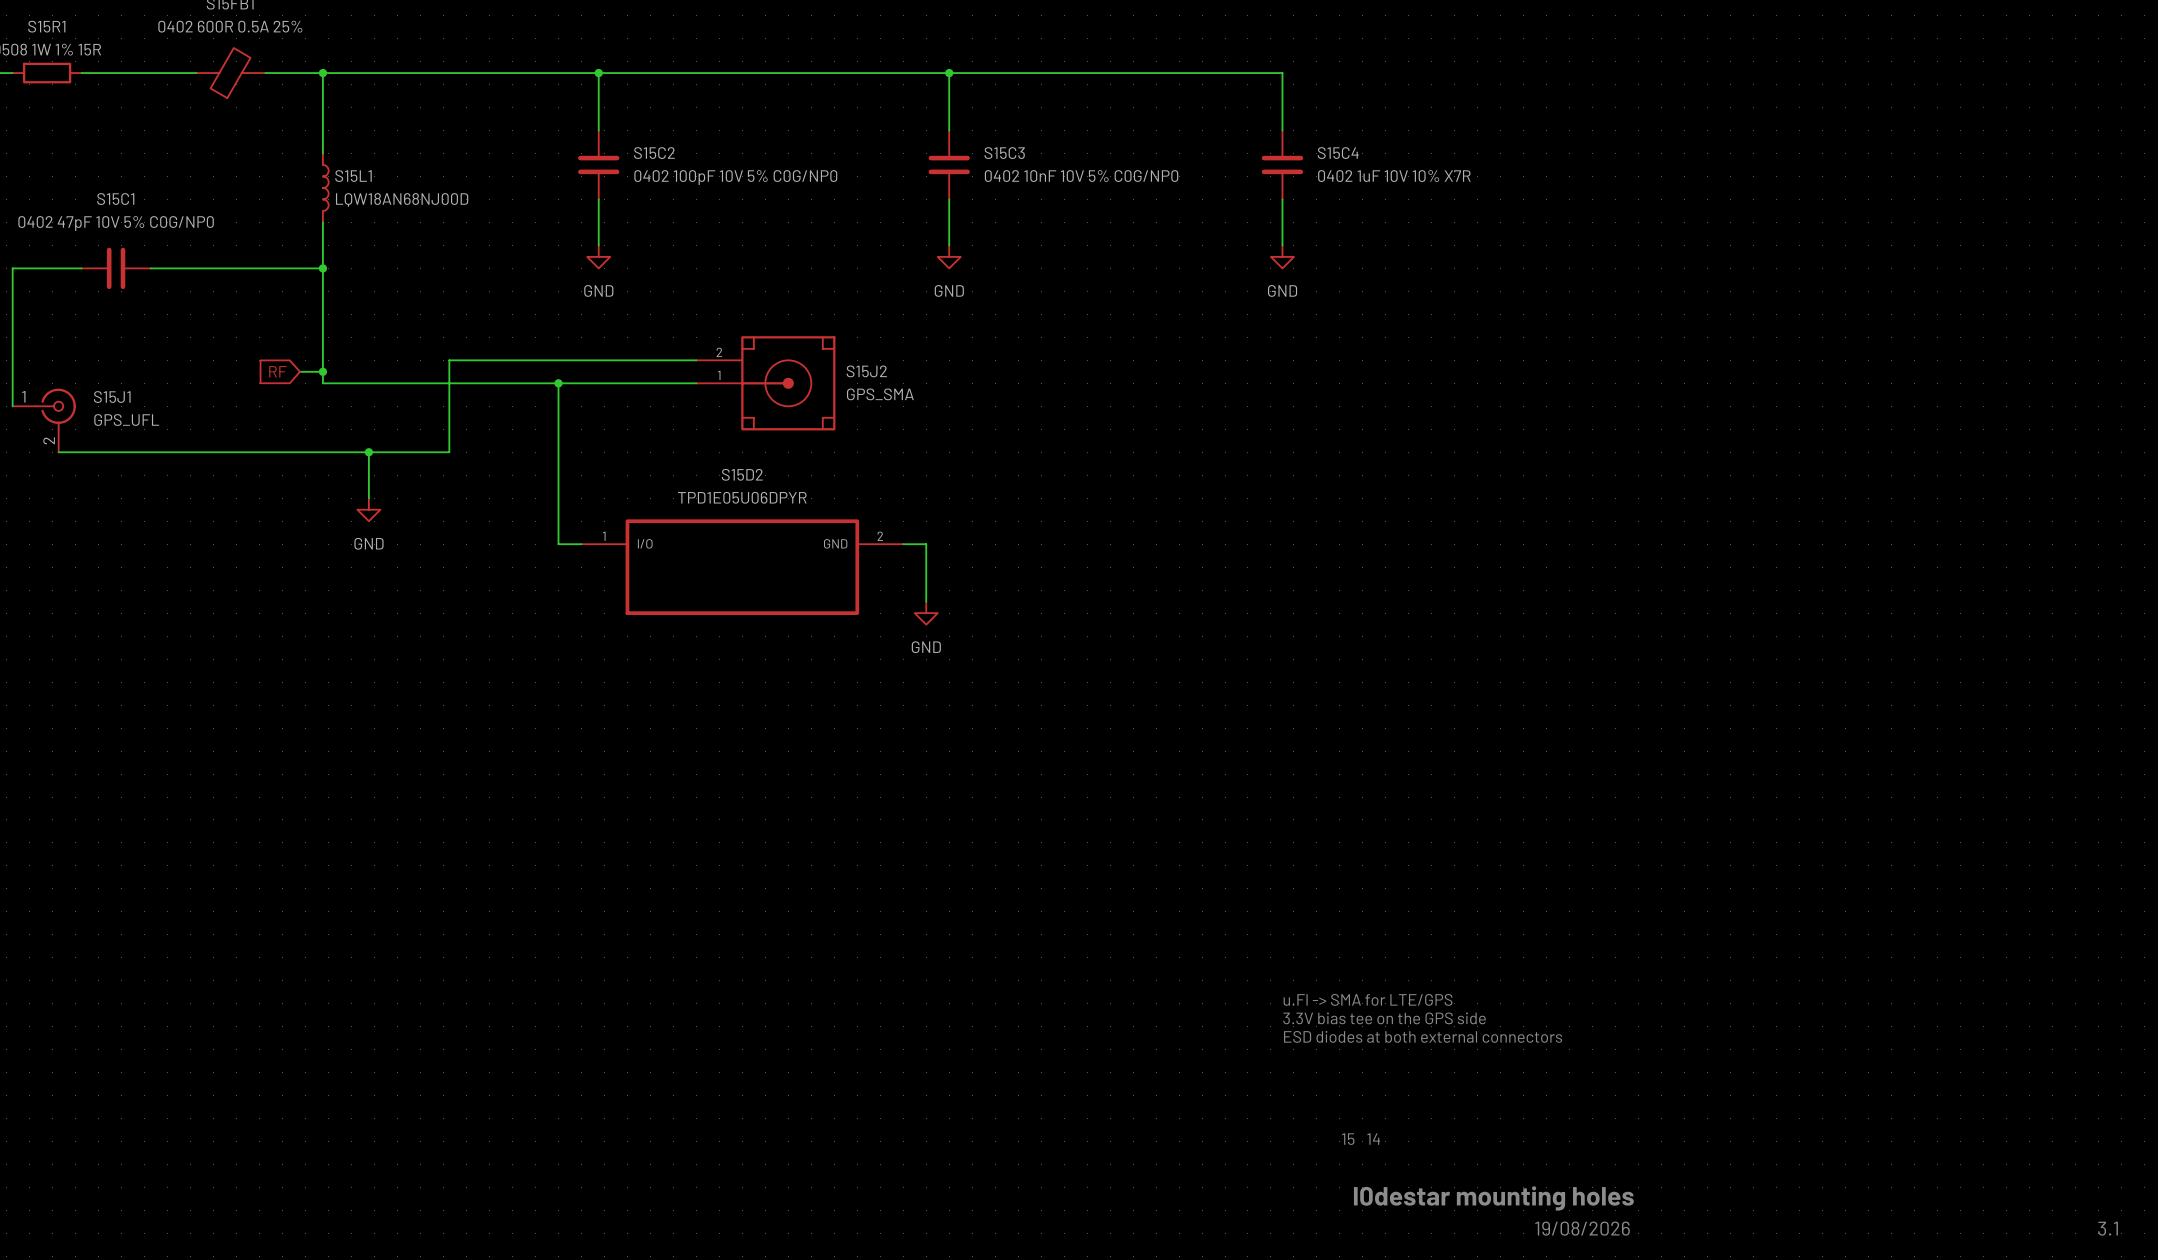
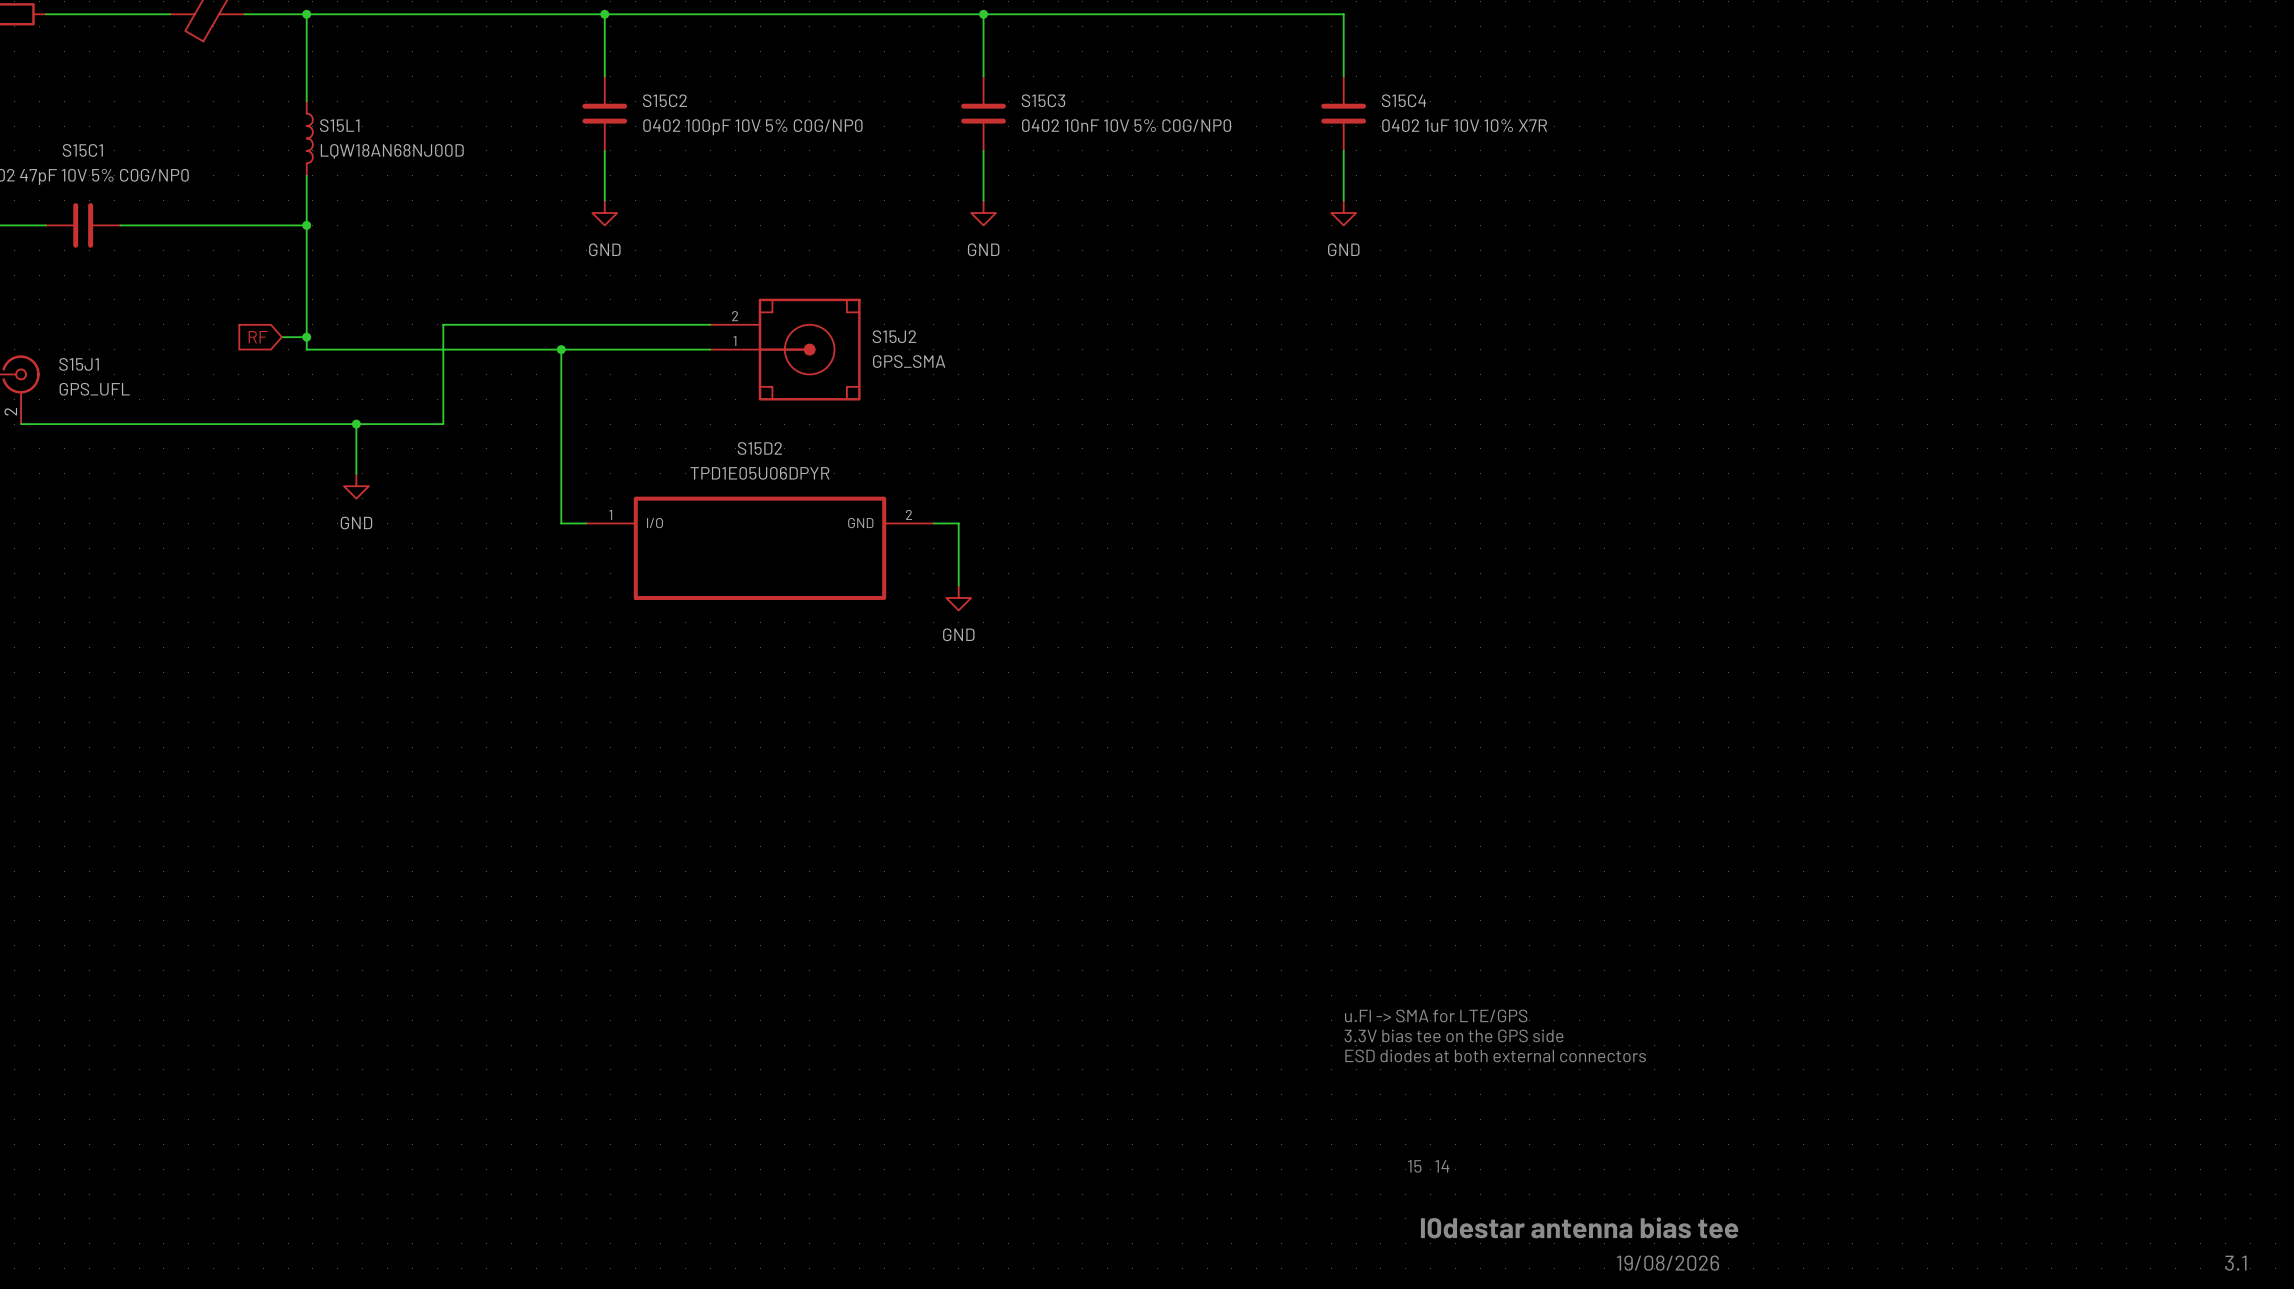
text: l0destar mounting holes (1493, 1198) -> l0destar antenna bias tee (1579, 1227)

